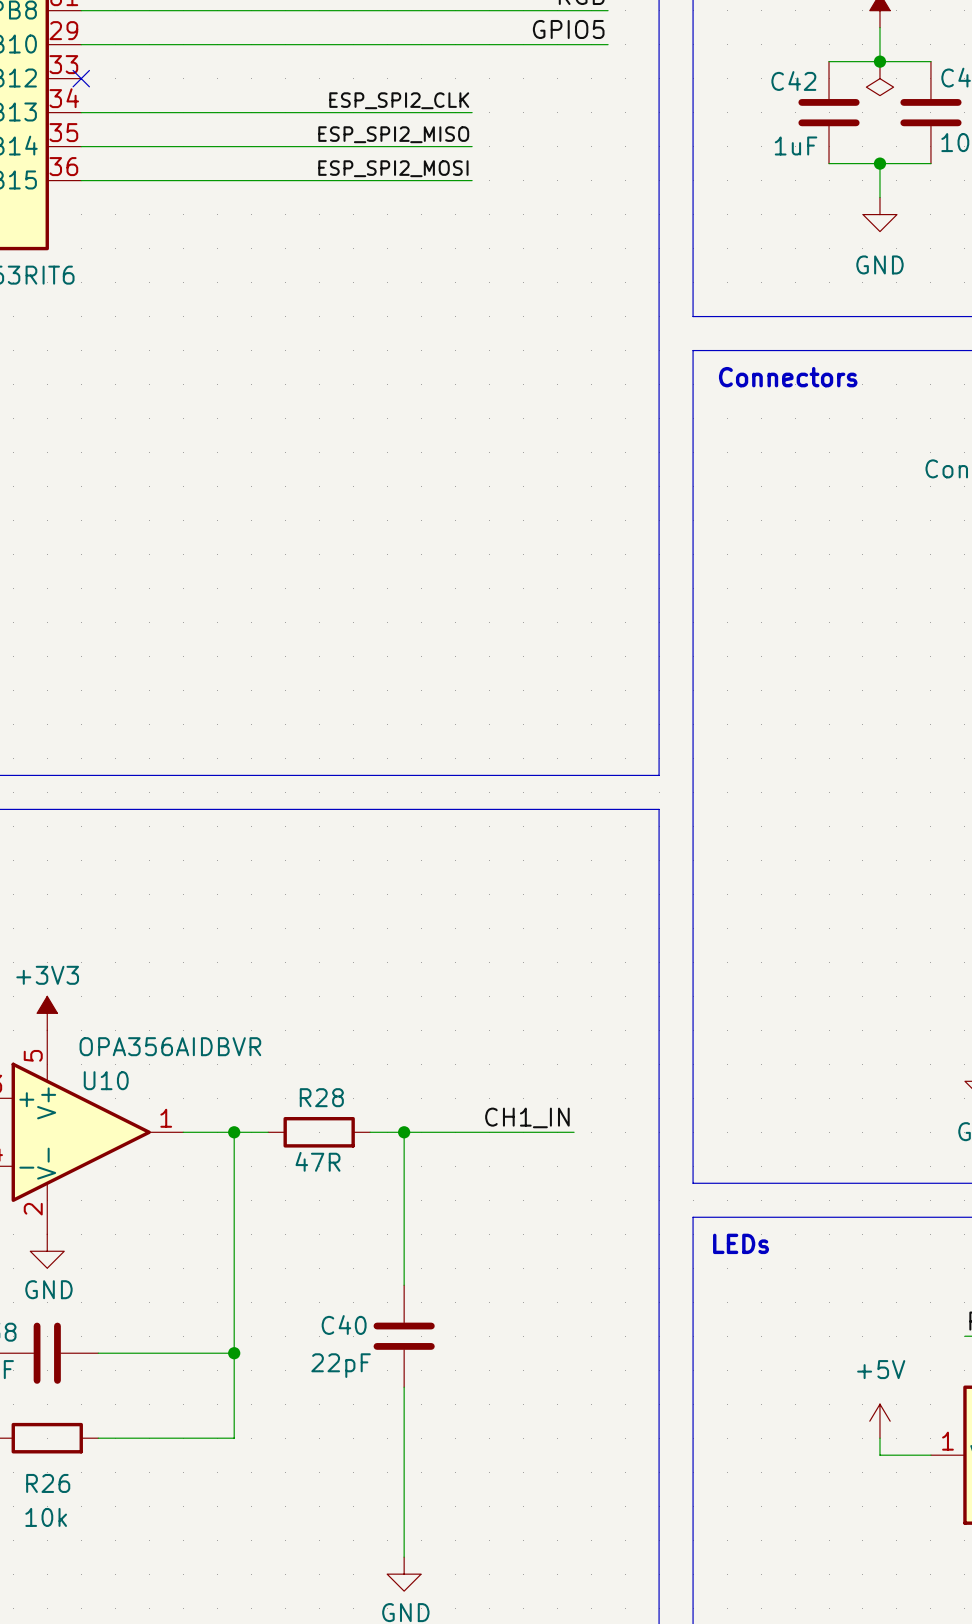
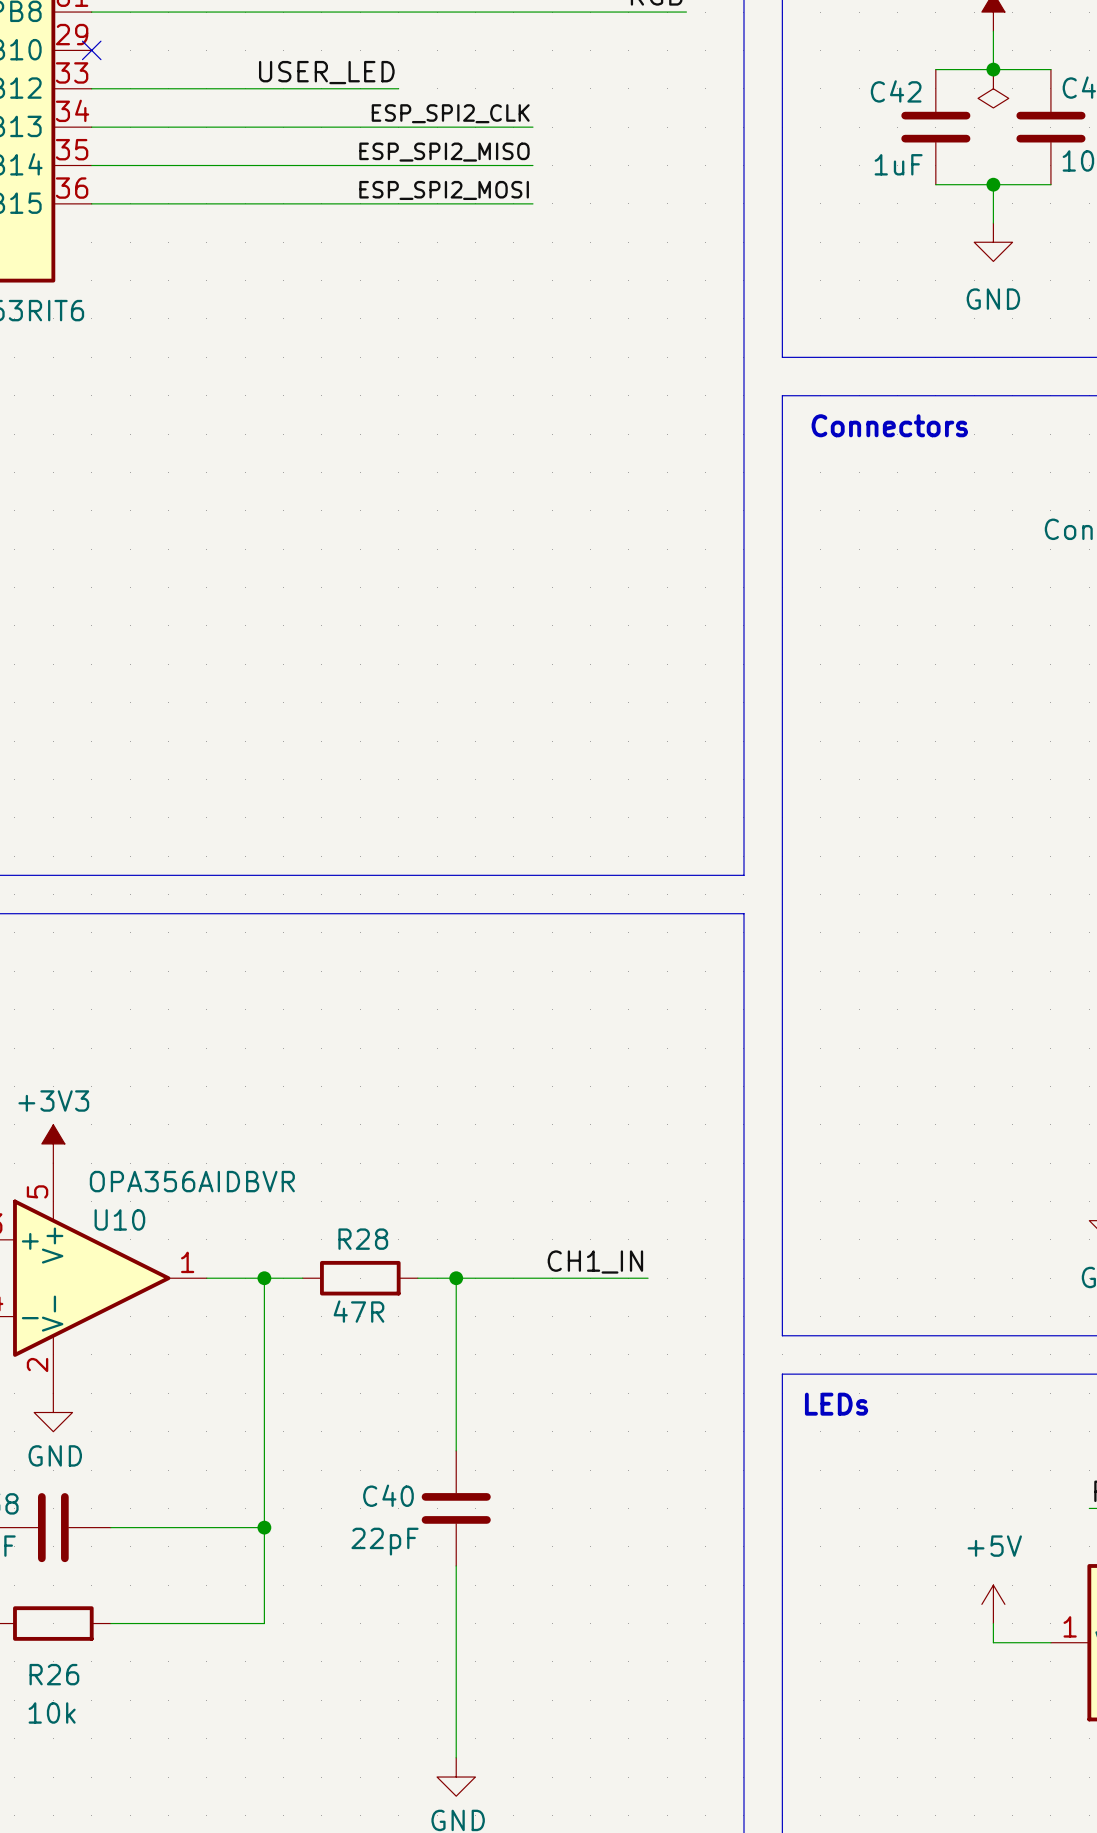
label: GPIO5 (568, 29) -> none
wire: (81, 44) (608, 44) -> none
label: none -> USER_LED (326, 72)
wire: none -> (91, 88) (398, 88)
no-connect mark position: (81, 78) -> (91, 50)

